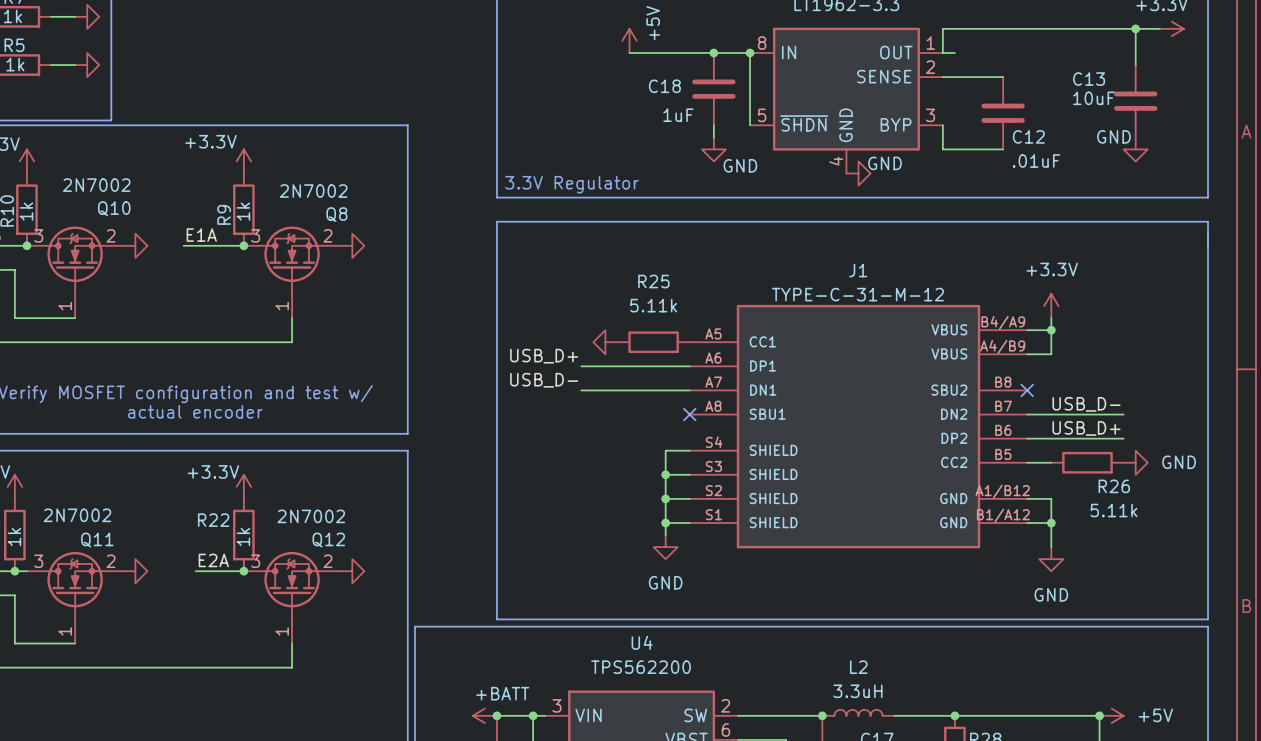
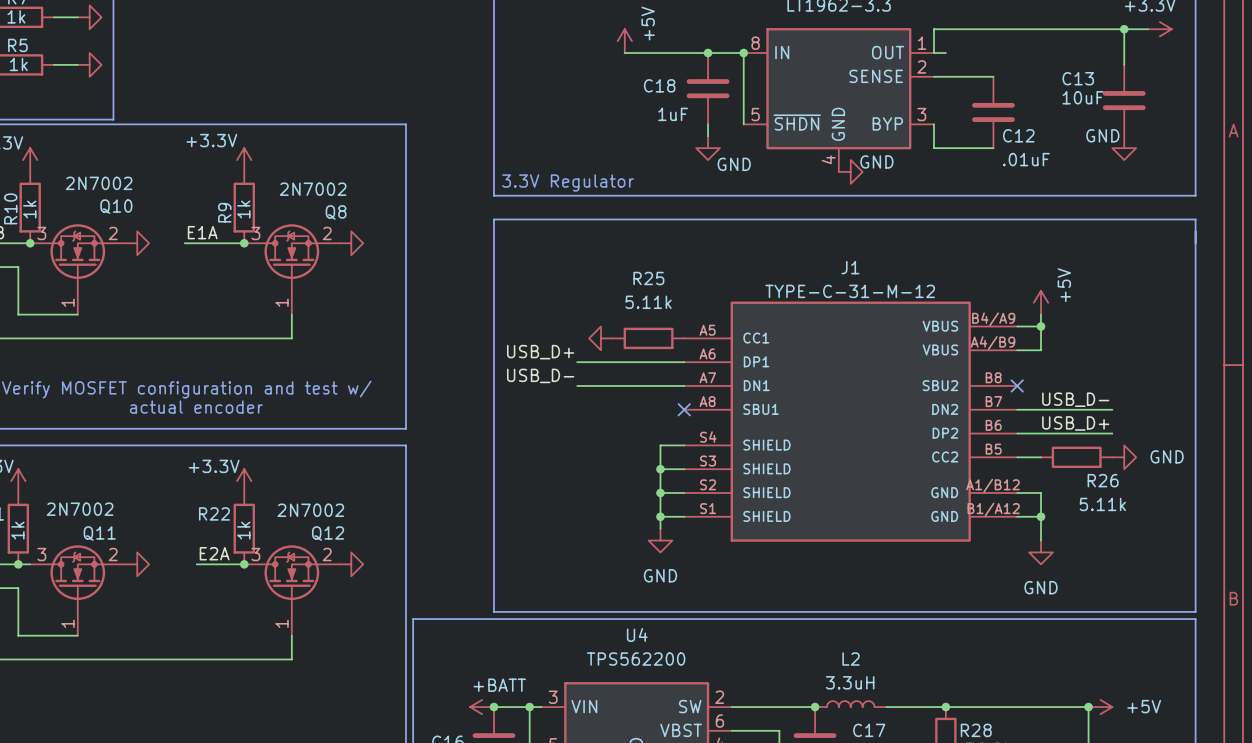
power symbol: +3.3V (1051, 306) -> +5V (1041, 302)

